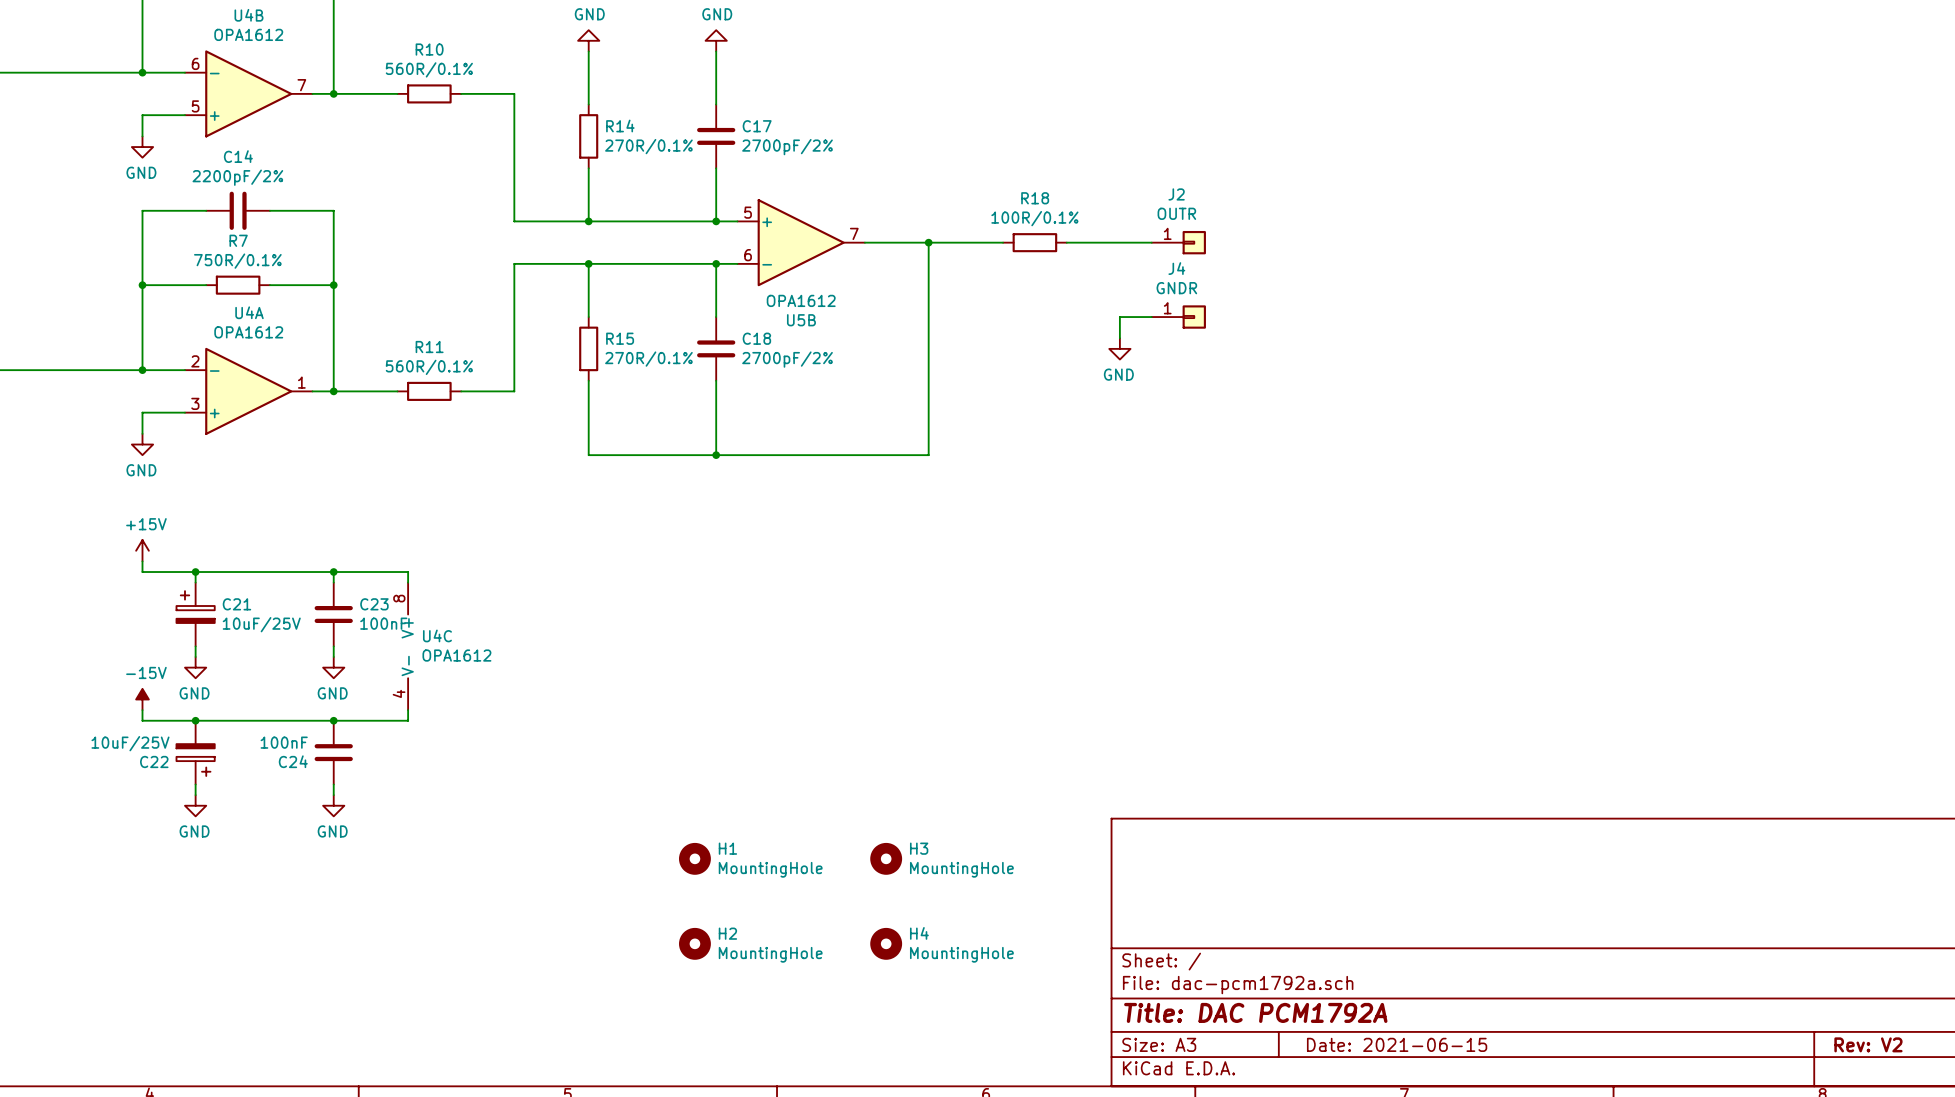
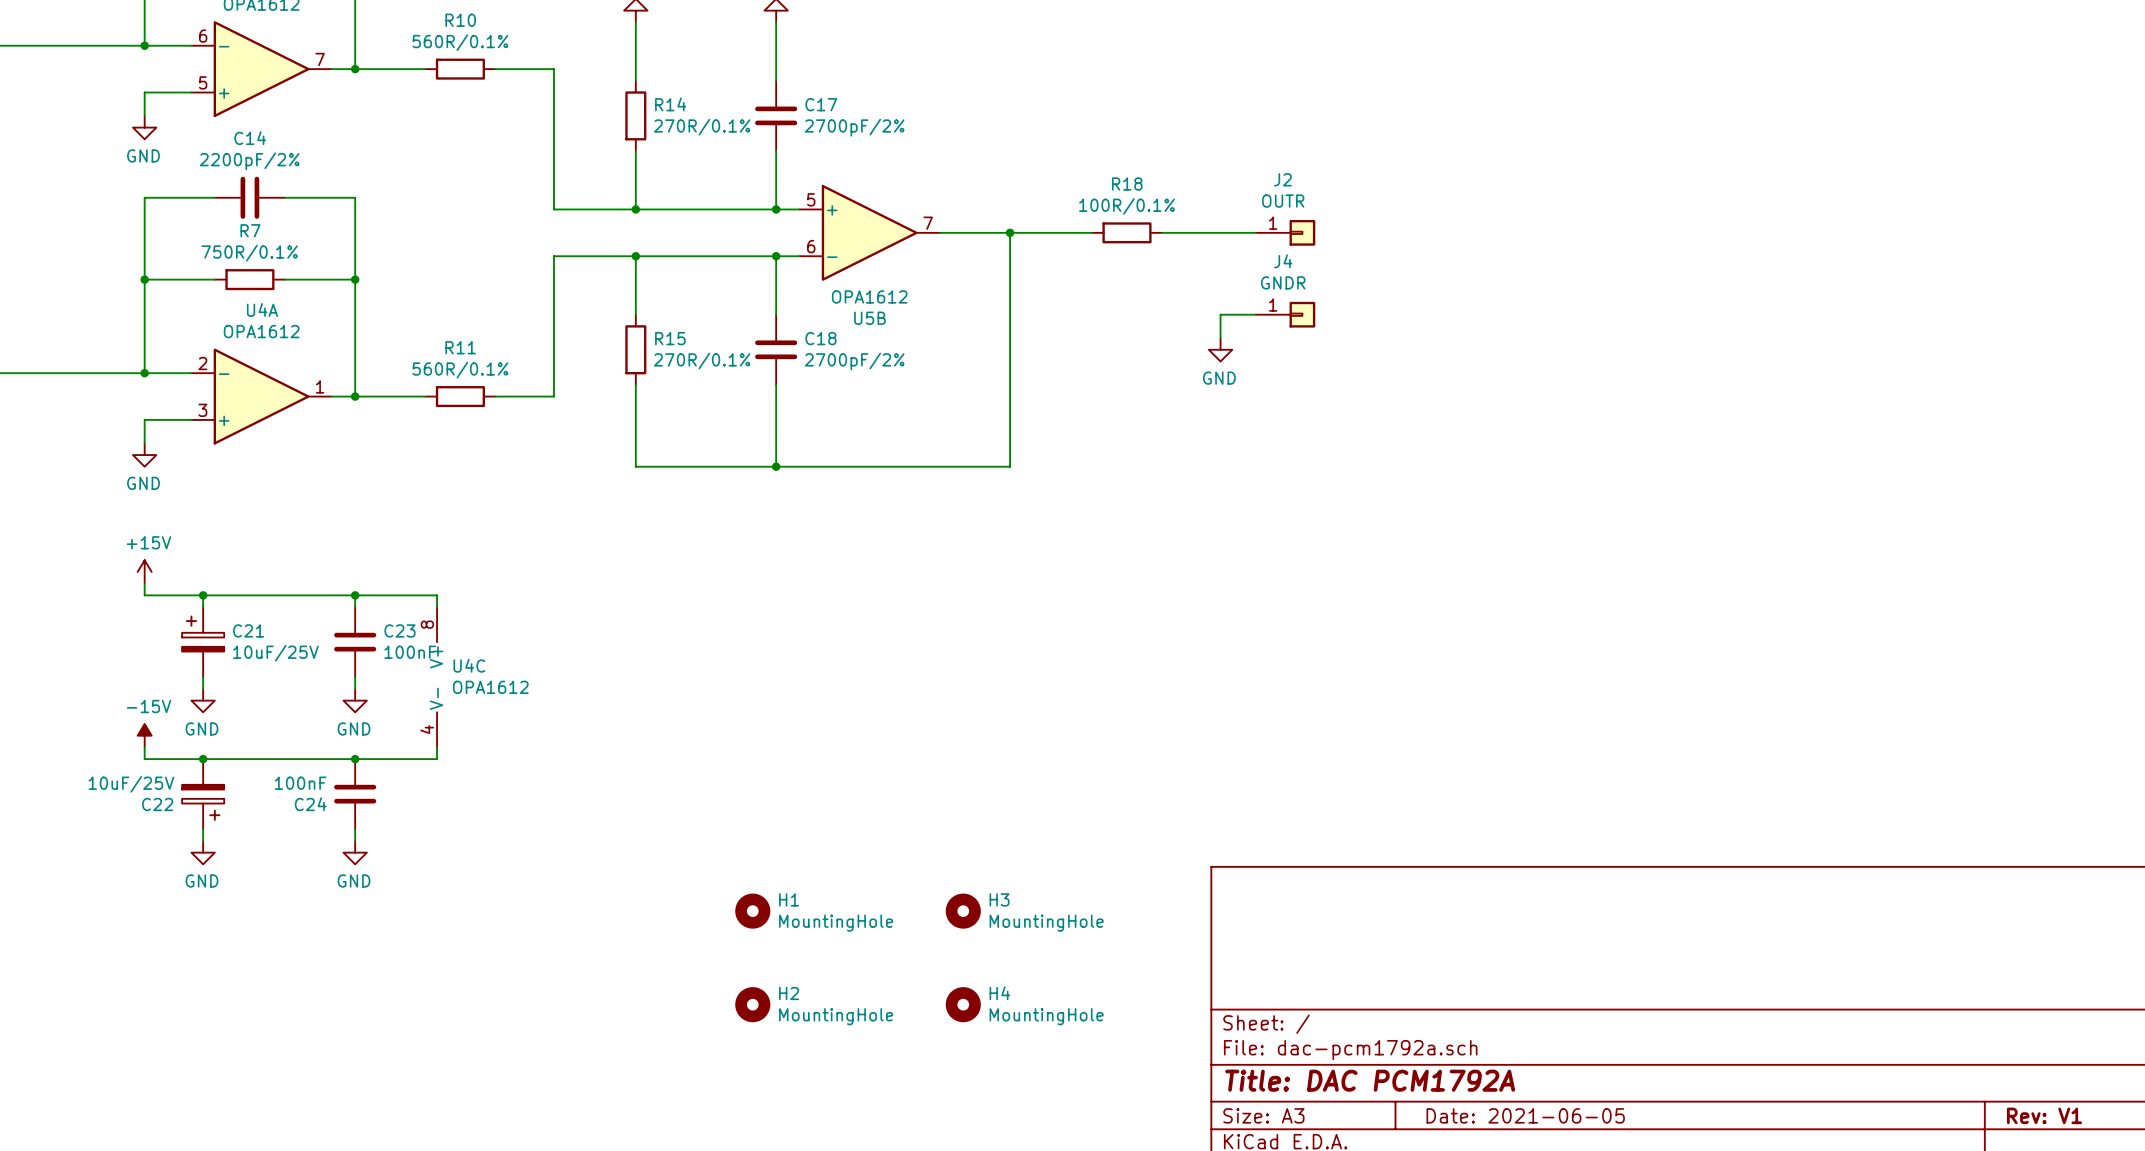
title block: Date: 2021-06-15 (1397, 1044) -> Date: 2021-06-05 (1525, 1115)
title block: Rev: V2 (1868, 1044) -> Rev: V1 (2044, 1115)

